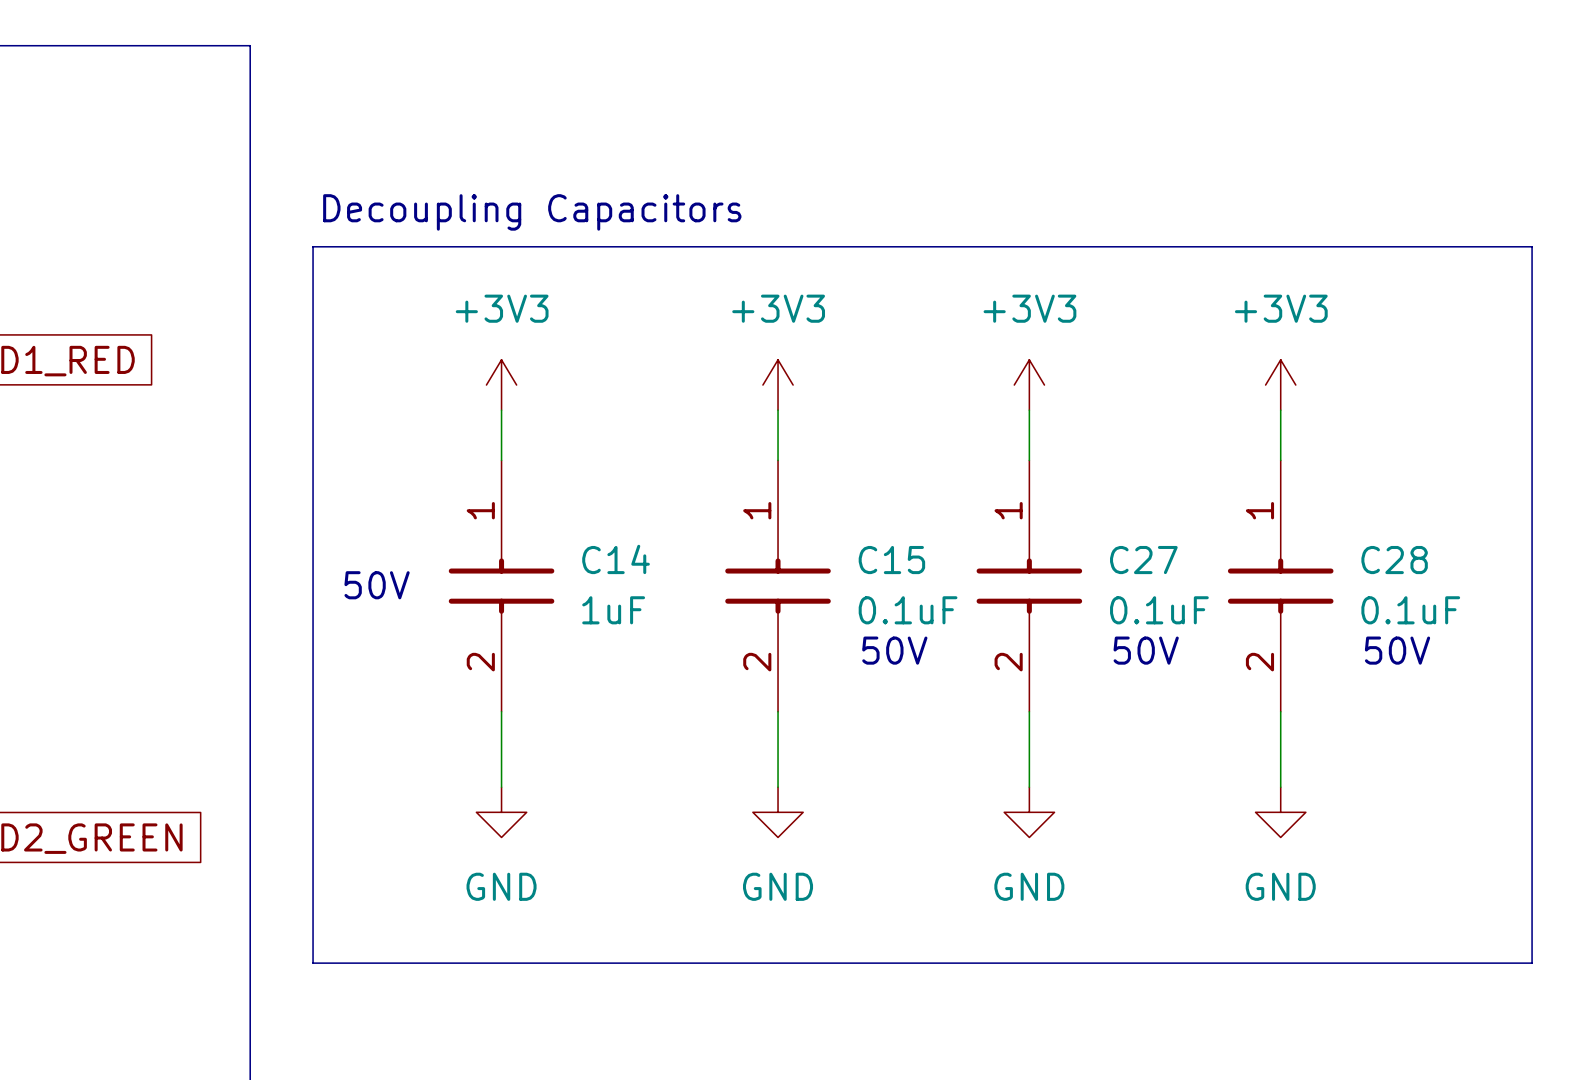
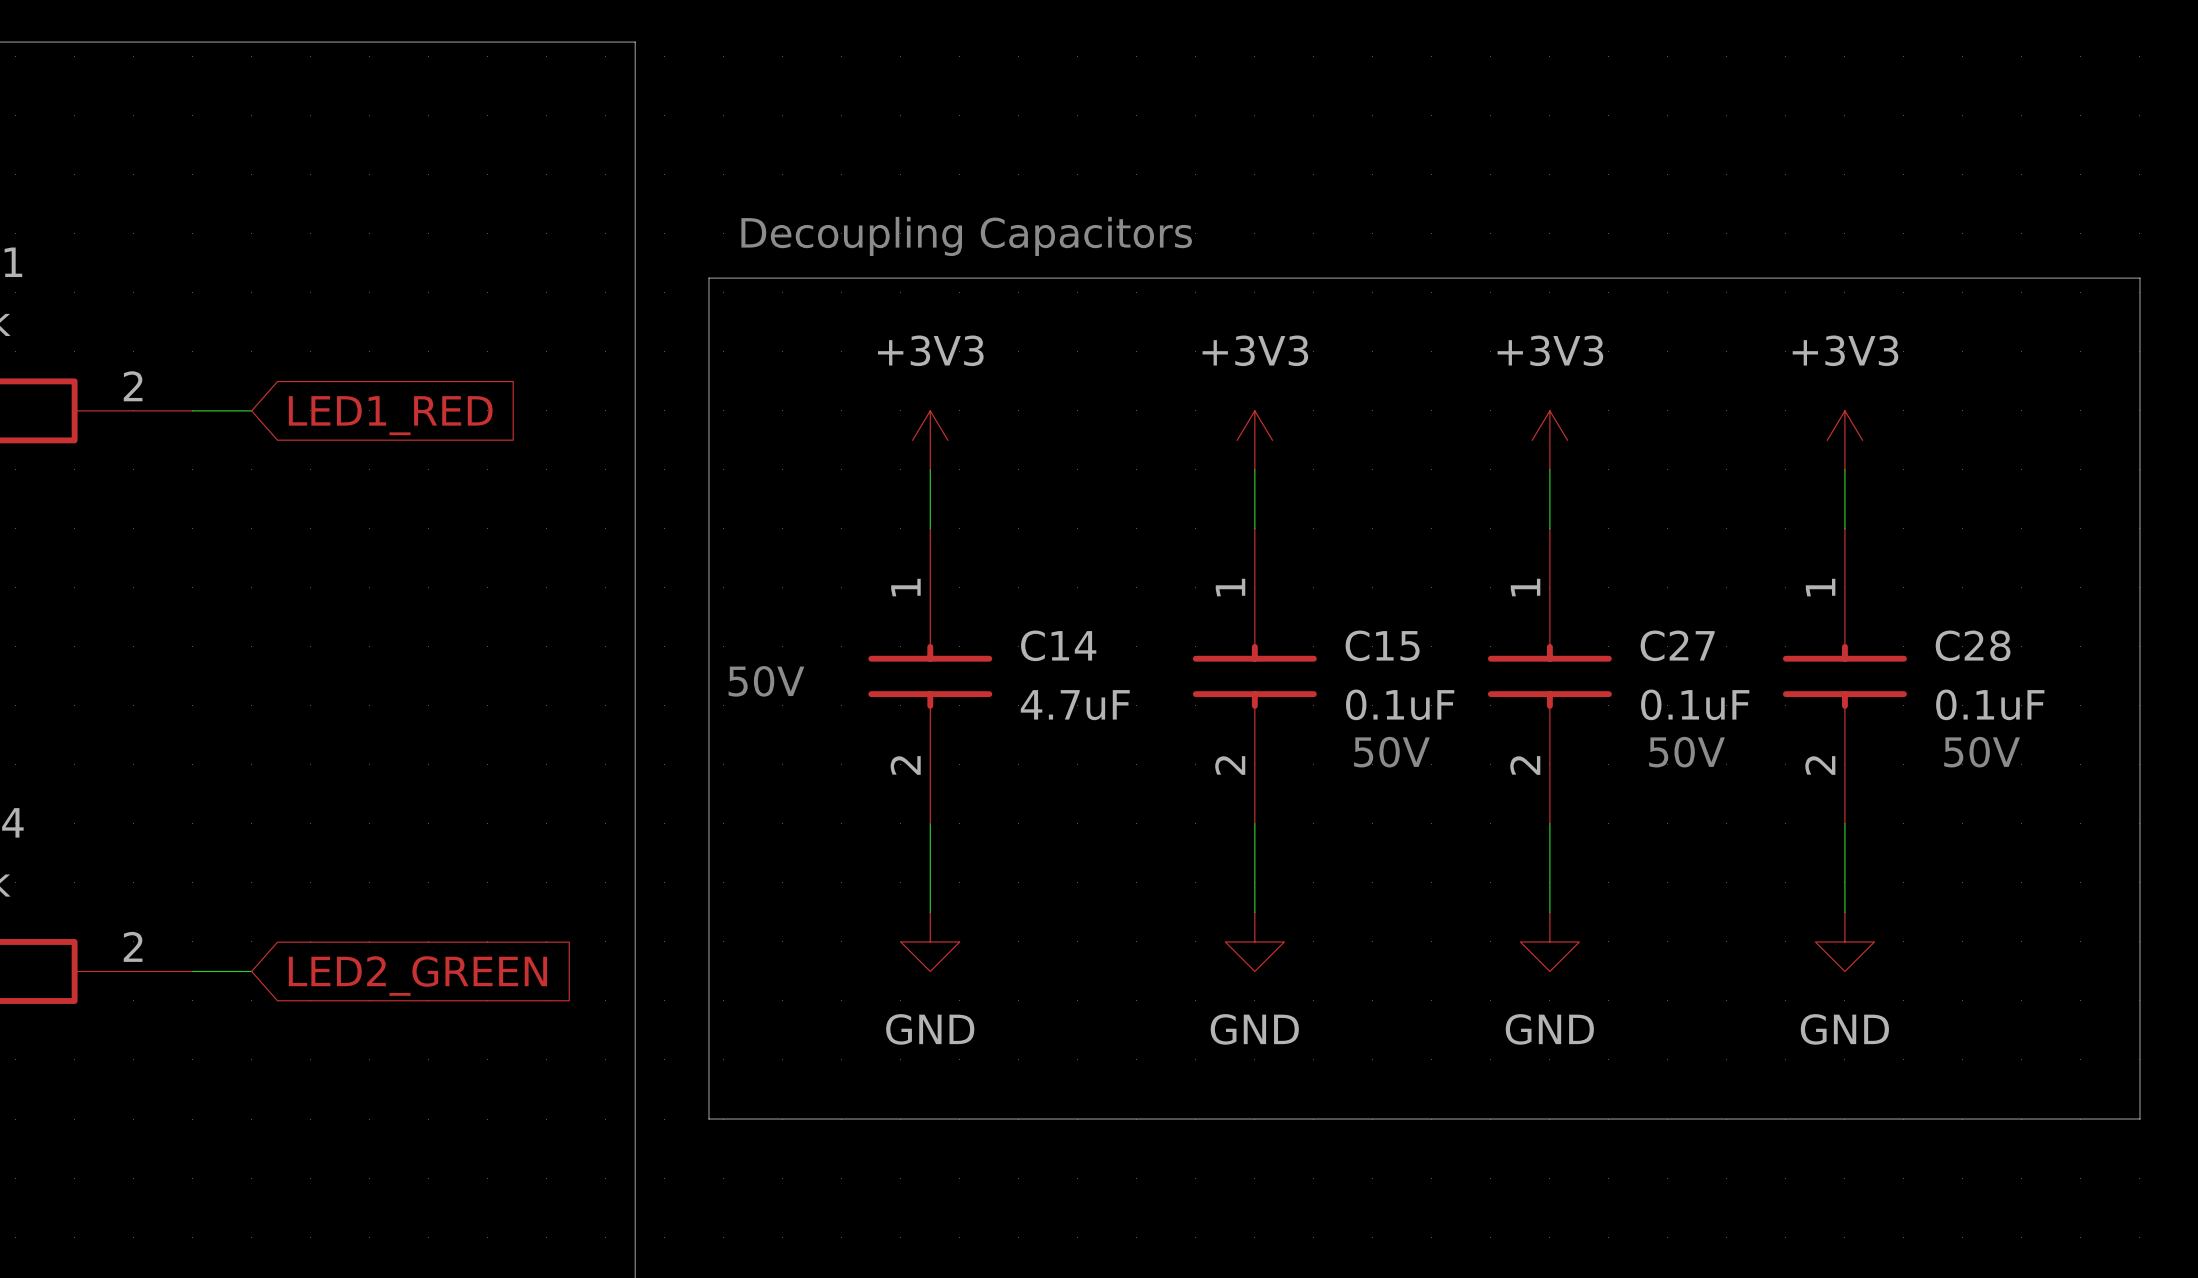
text position: 50V (377, 585) -> 50V (766, 681)
C14 value: 1uF (613, 610) -> 4.7uF (1075, 705)

